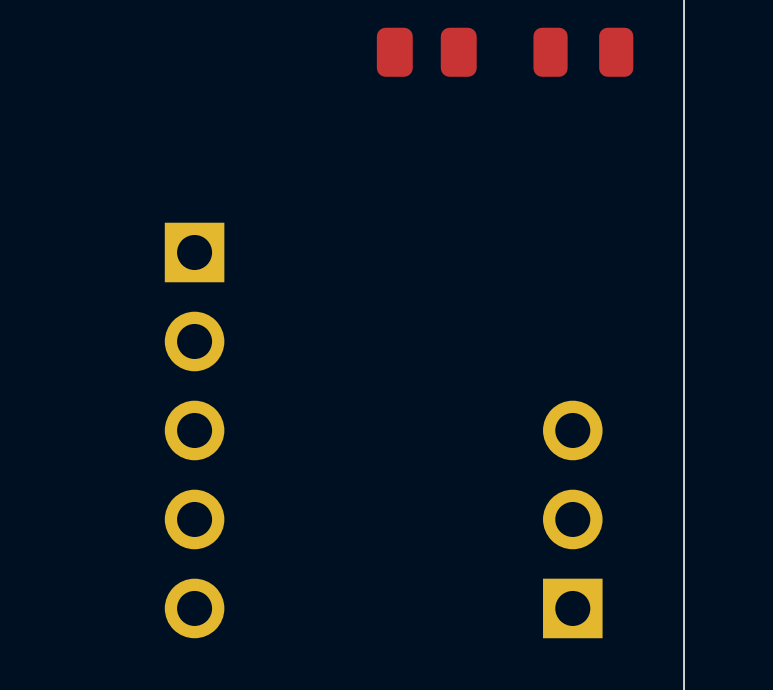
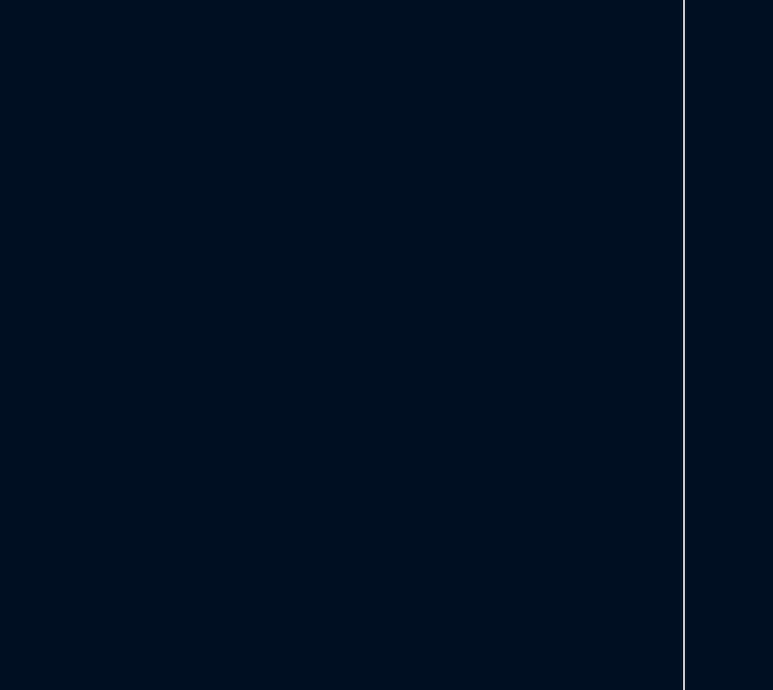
part: (426, 52) -> none
part: (583, 52) -> none
part: (194, 430) -> none
part: (572, 519) -> none

